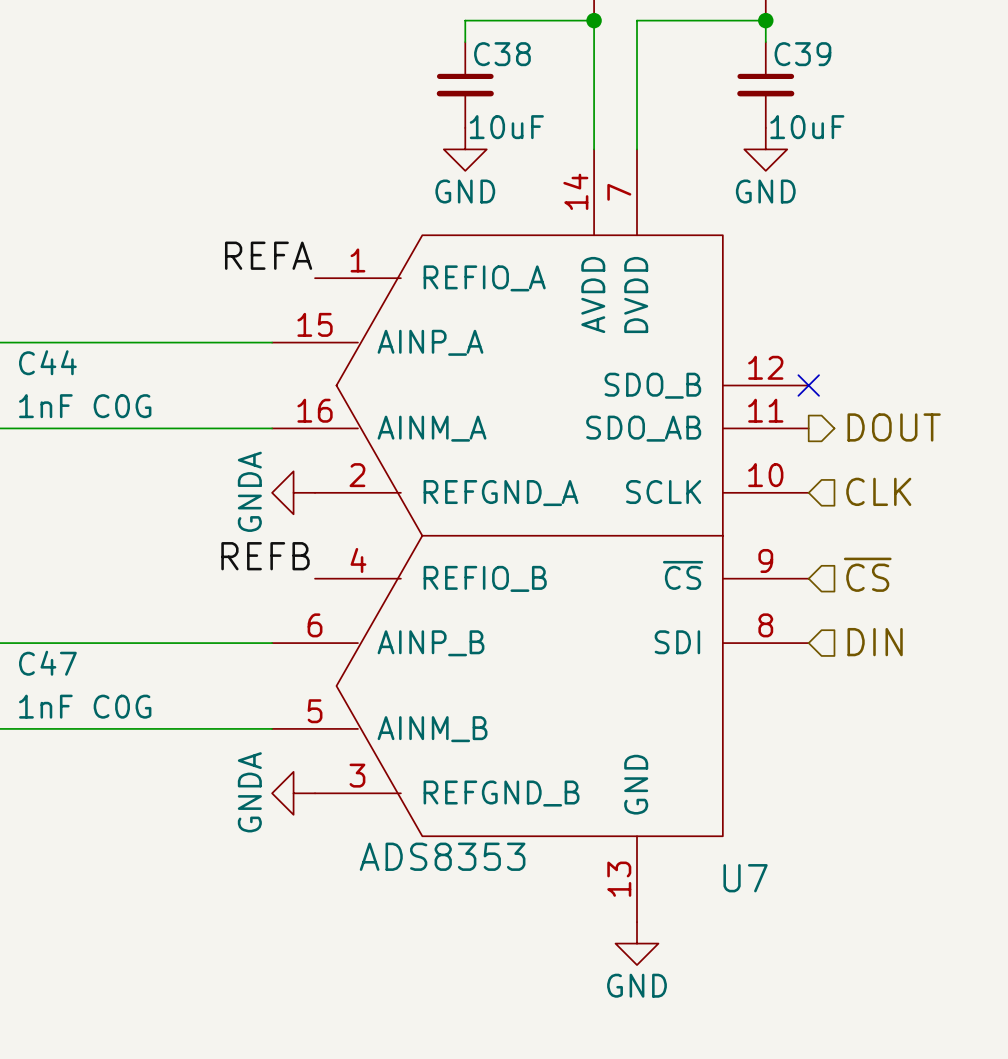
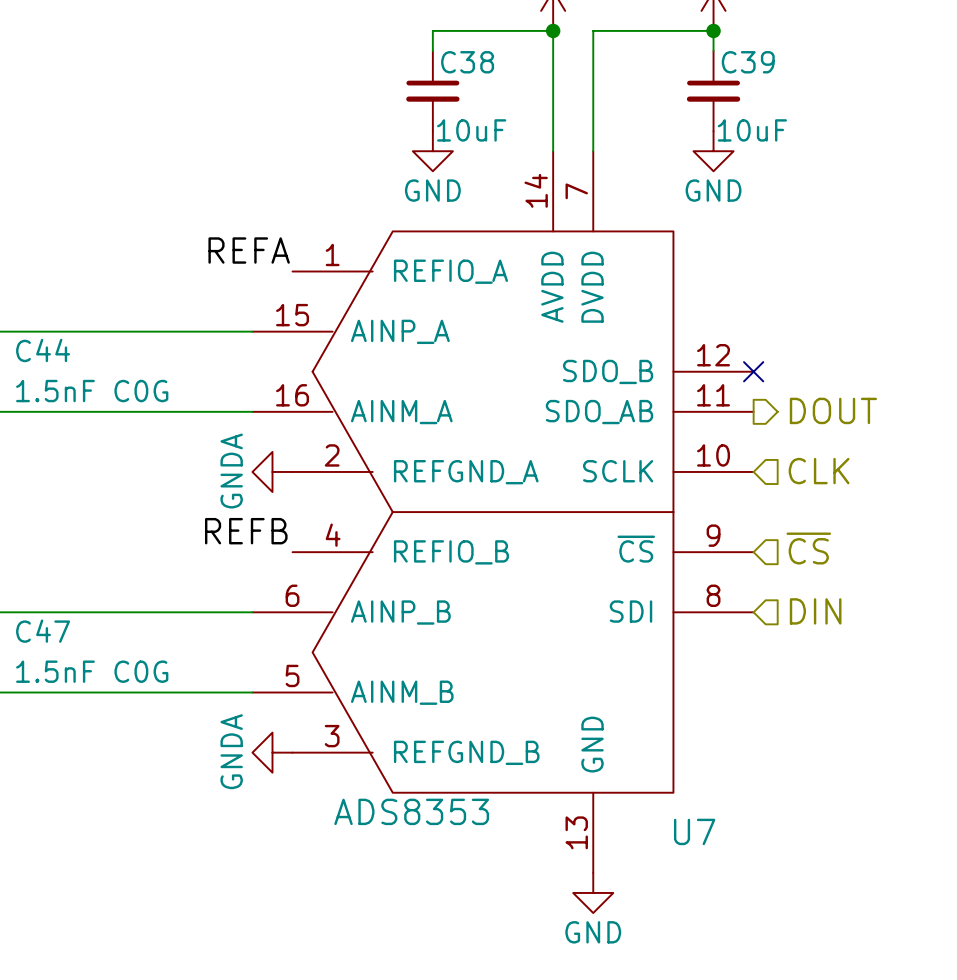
C44 value: 1nF C0G (85, 406) -> 1.5nF C0G (92, 391)
C47 value: 1nF C0G (85, 706) -> 1.5nF C0G (92, 671)

